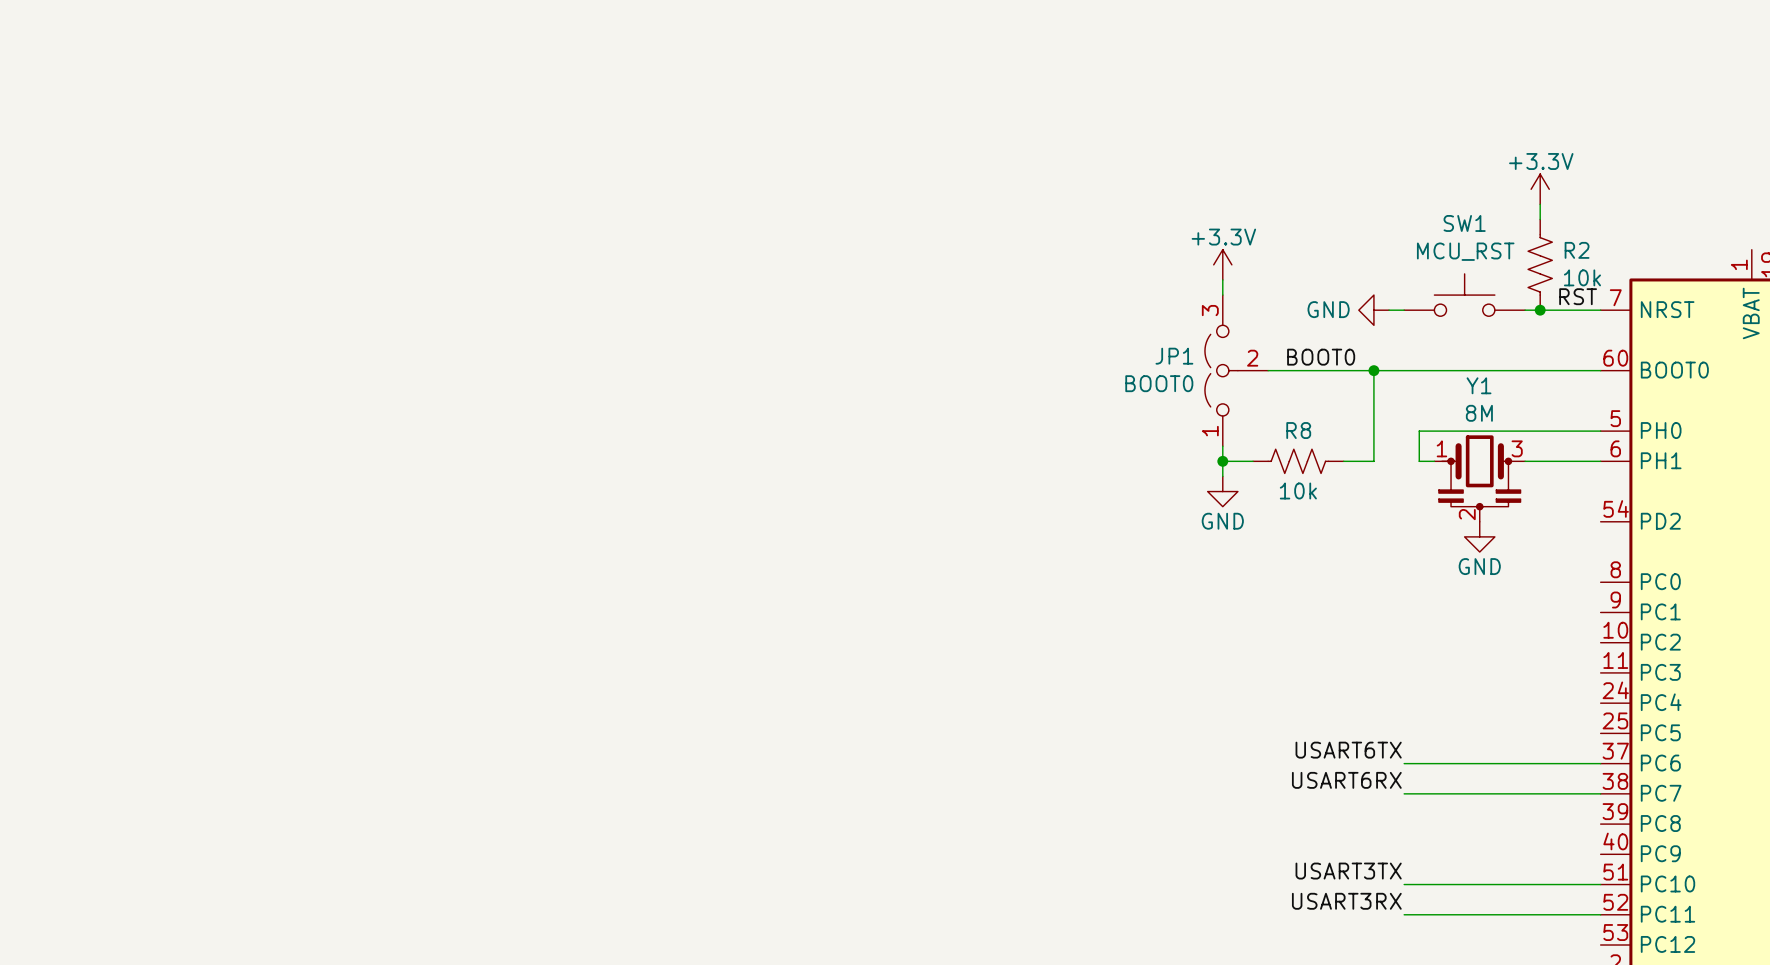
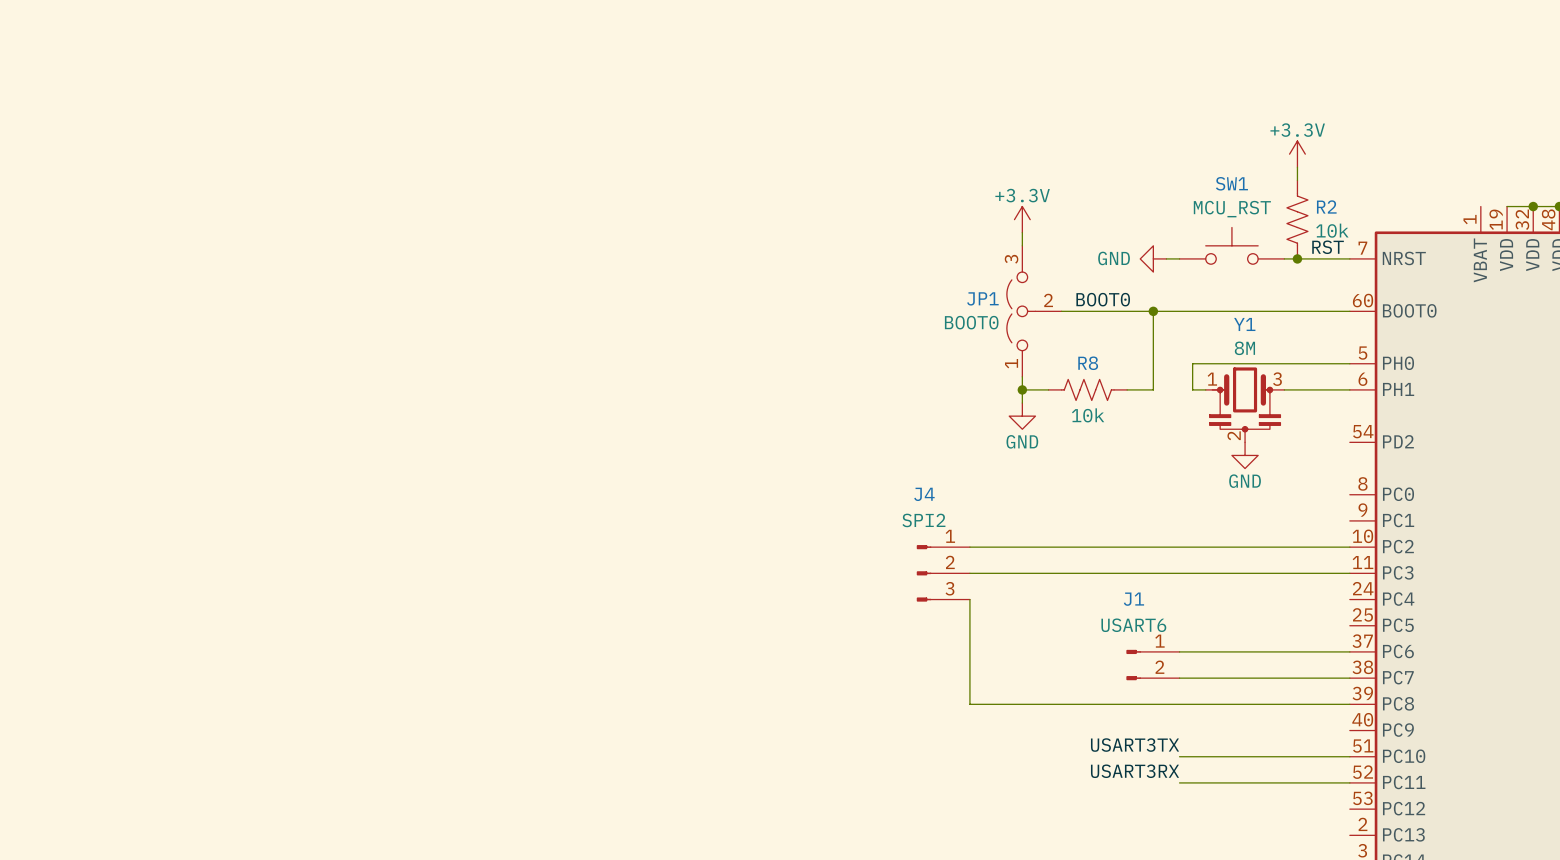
wire: none -> (969, 547) (1349, 547)
J4: none -> SPI2 (943, 573)
wire: none -> (969, 573) (1349, 573)
wire: none -> (969, 599) (969, 704) (1349, 704)
label: USART6TX (1348, 750) -> none
J1: none -> USART6 (1152, 665)
label: USART6RX (1346, 780) -> none

